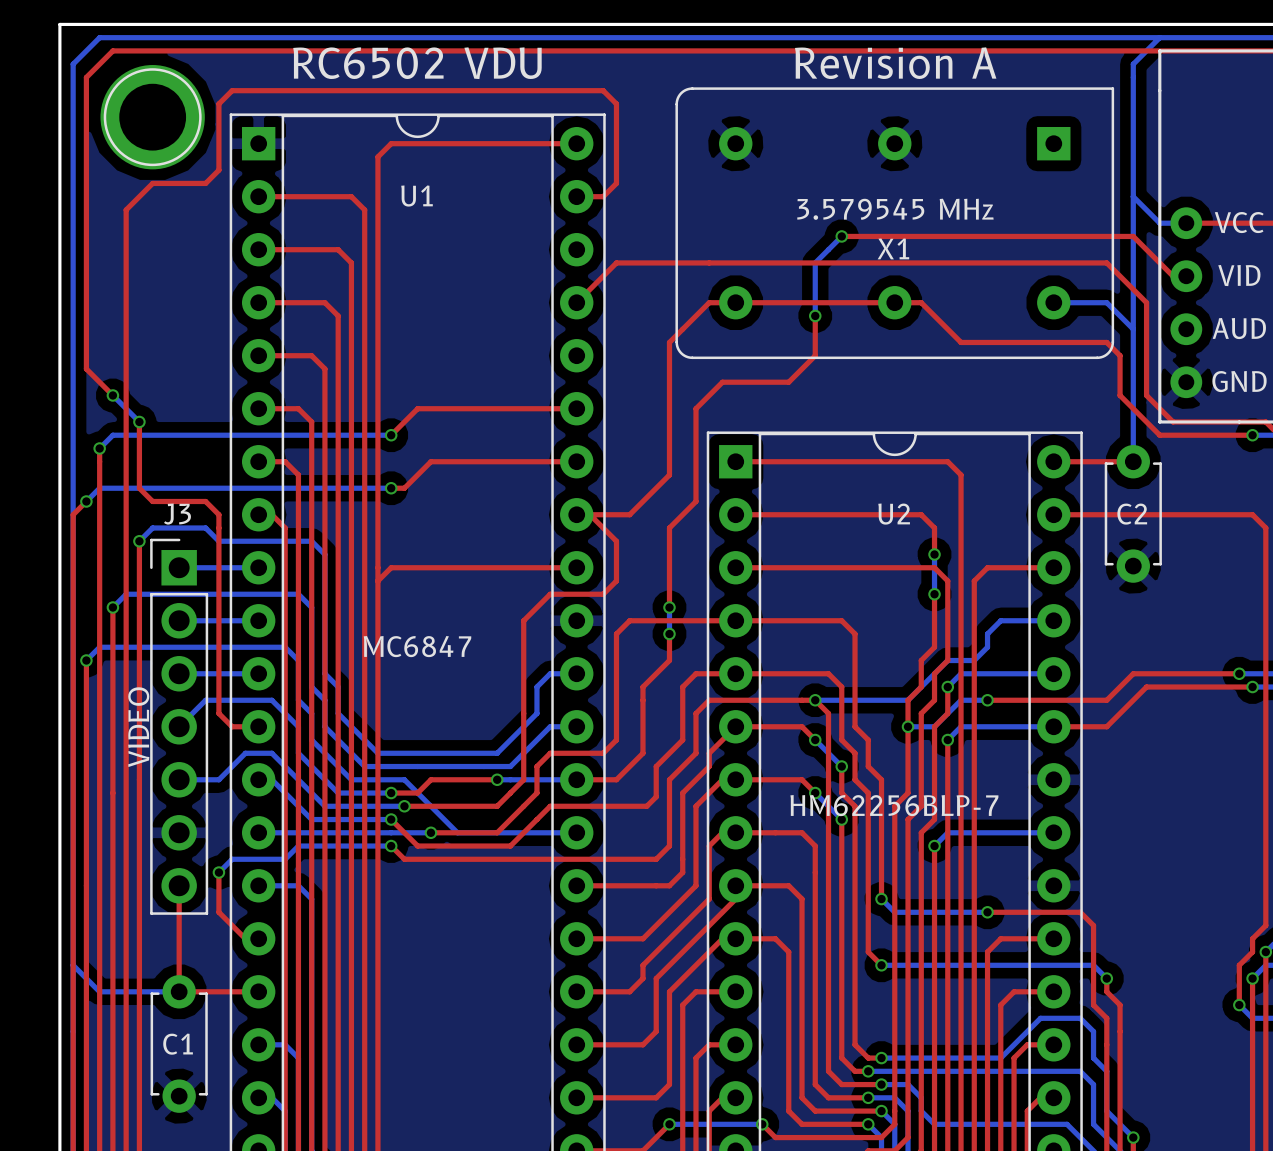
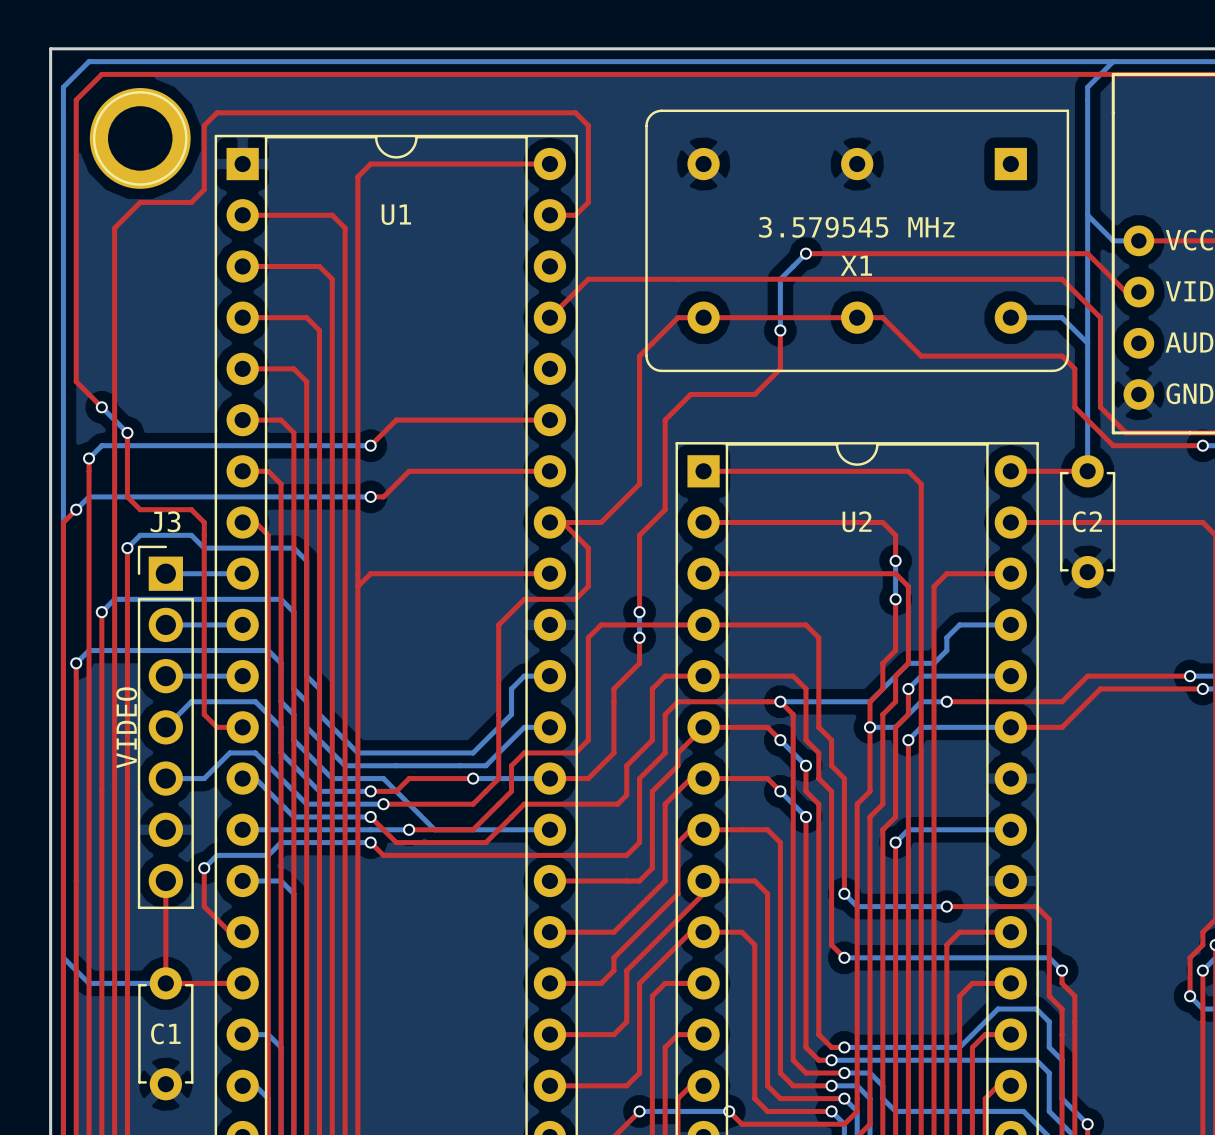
text: RC6502 VDU (417, 63) -> none
text: Revision A (895, 63) -> none
U1 value: MC6847 (417, 646) -> none
U2 value: HM62256BLP-7 (894, 805) -> none

